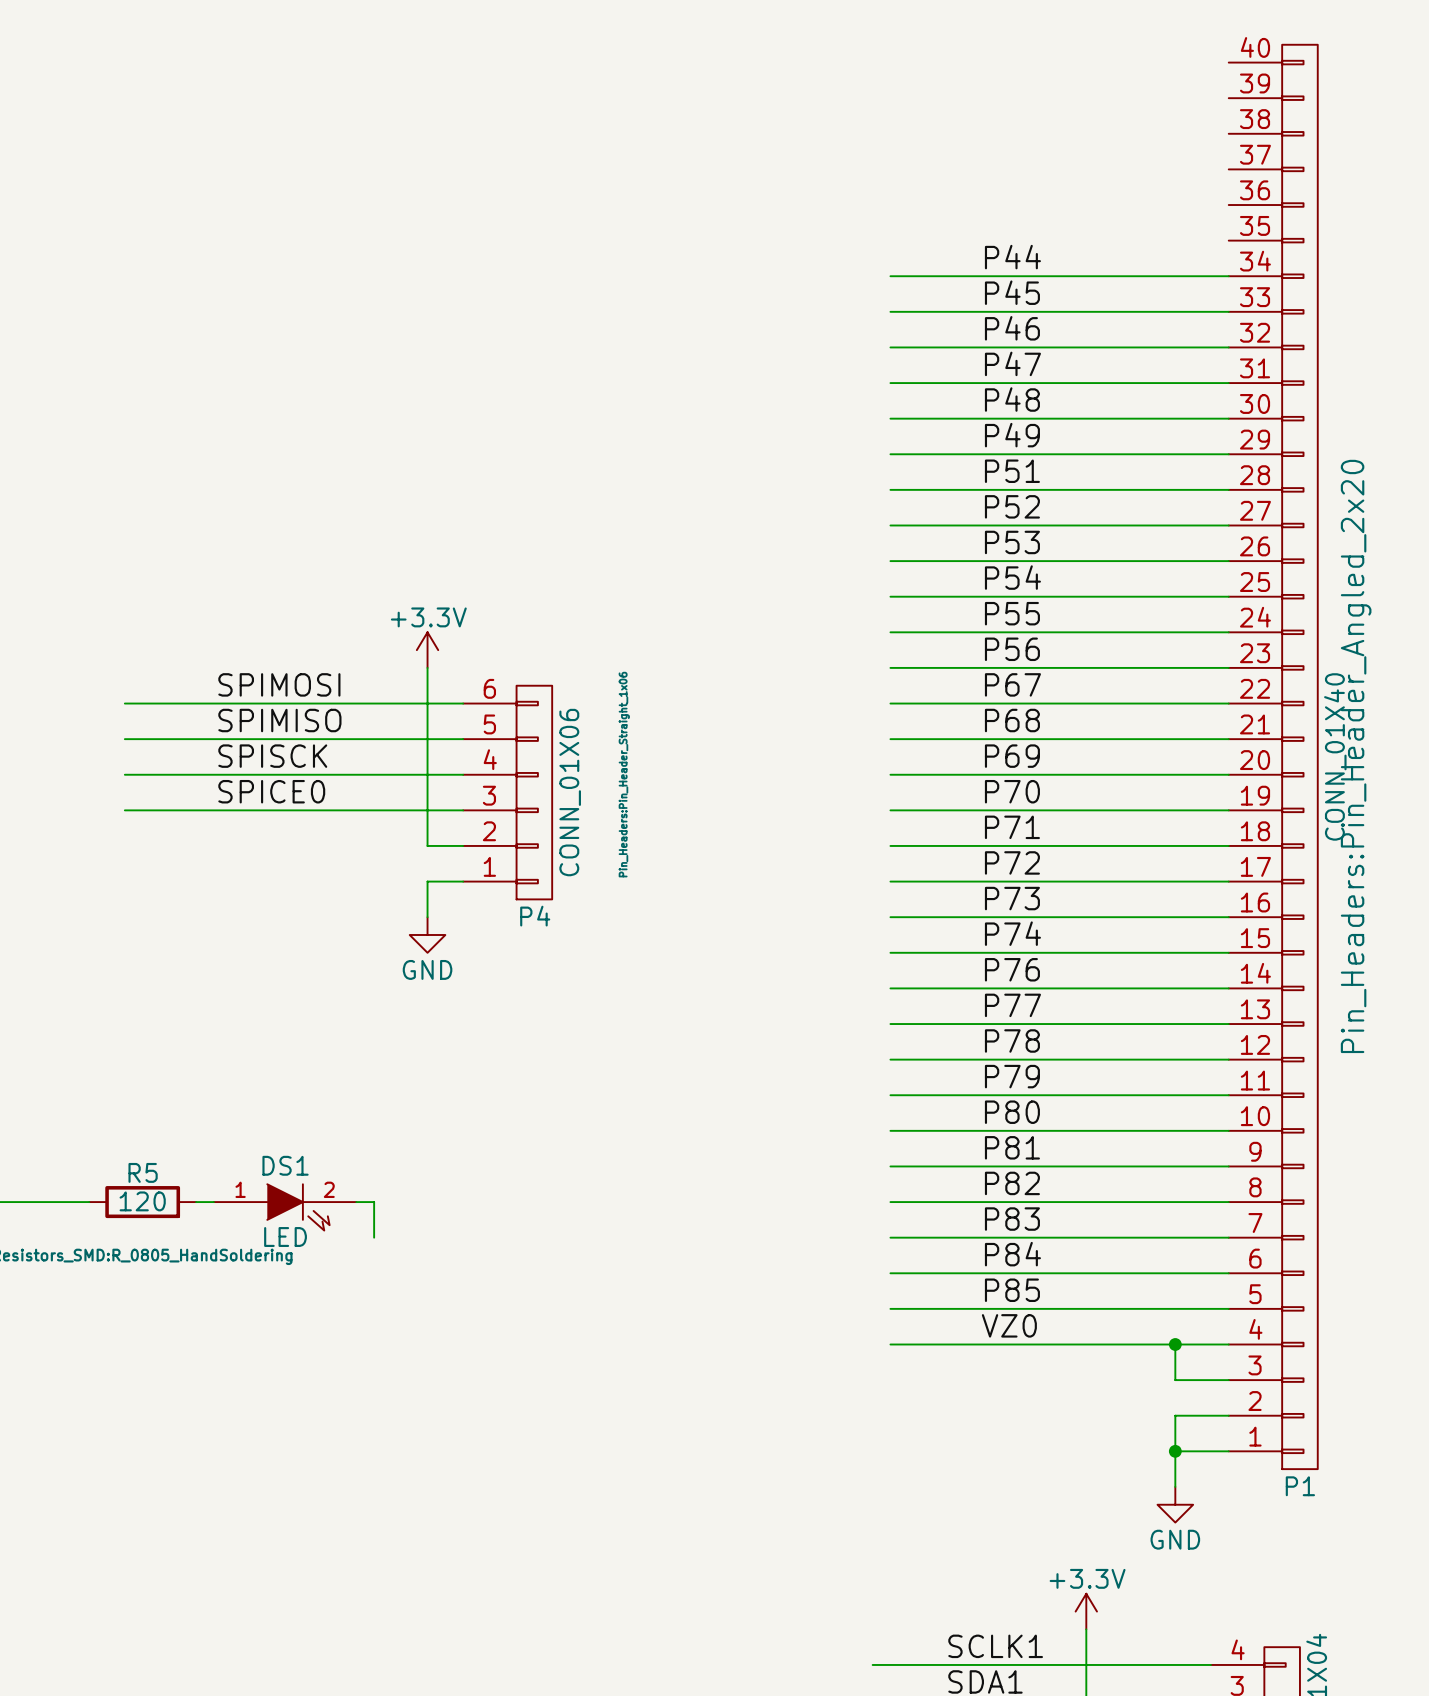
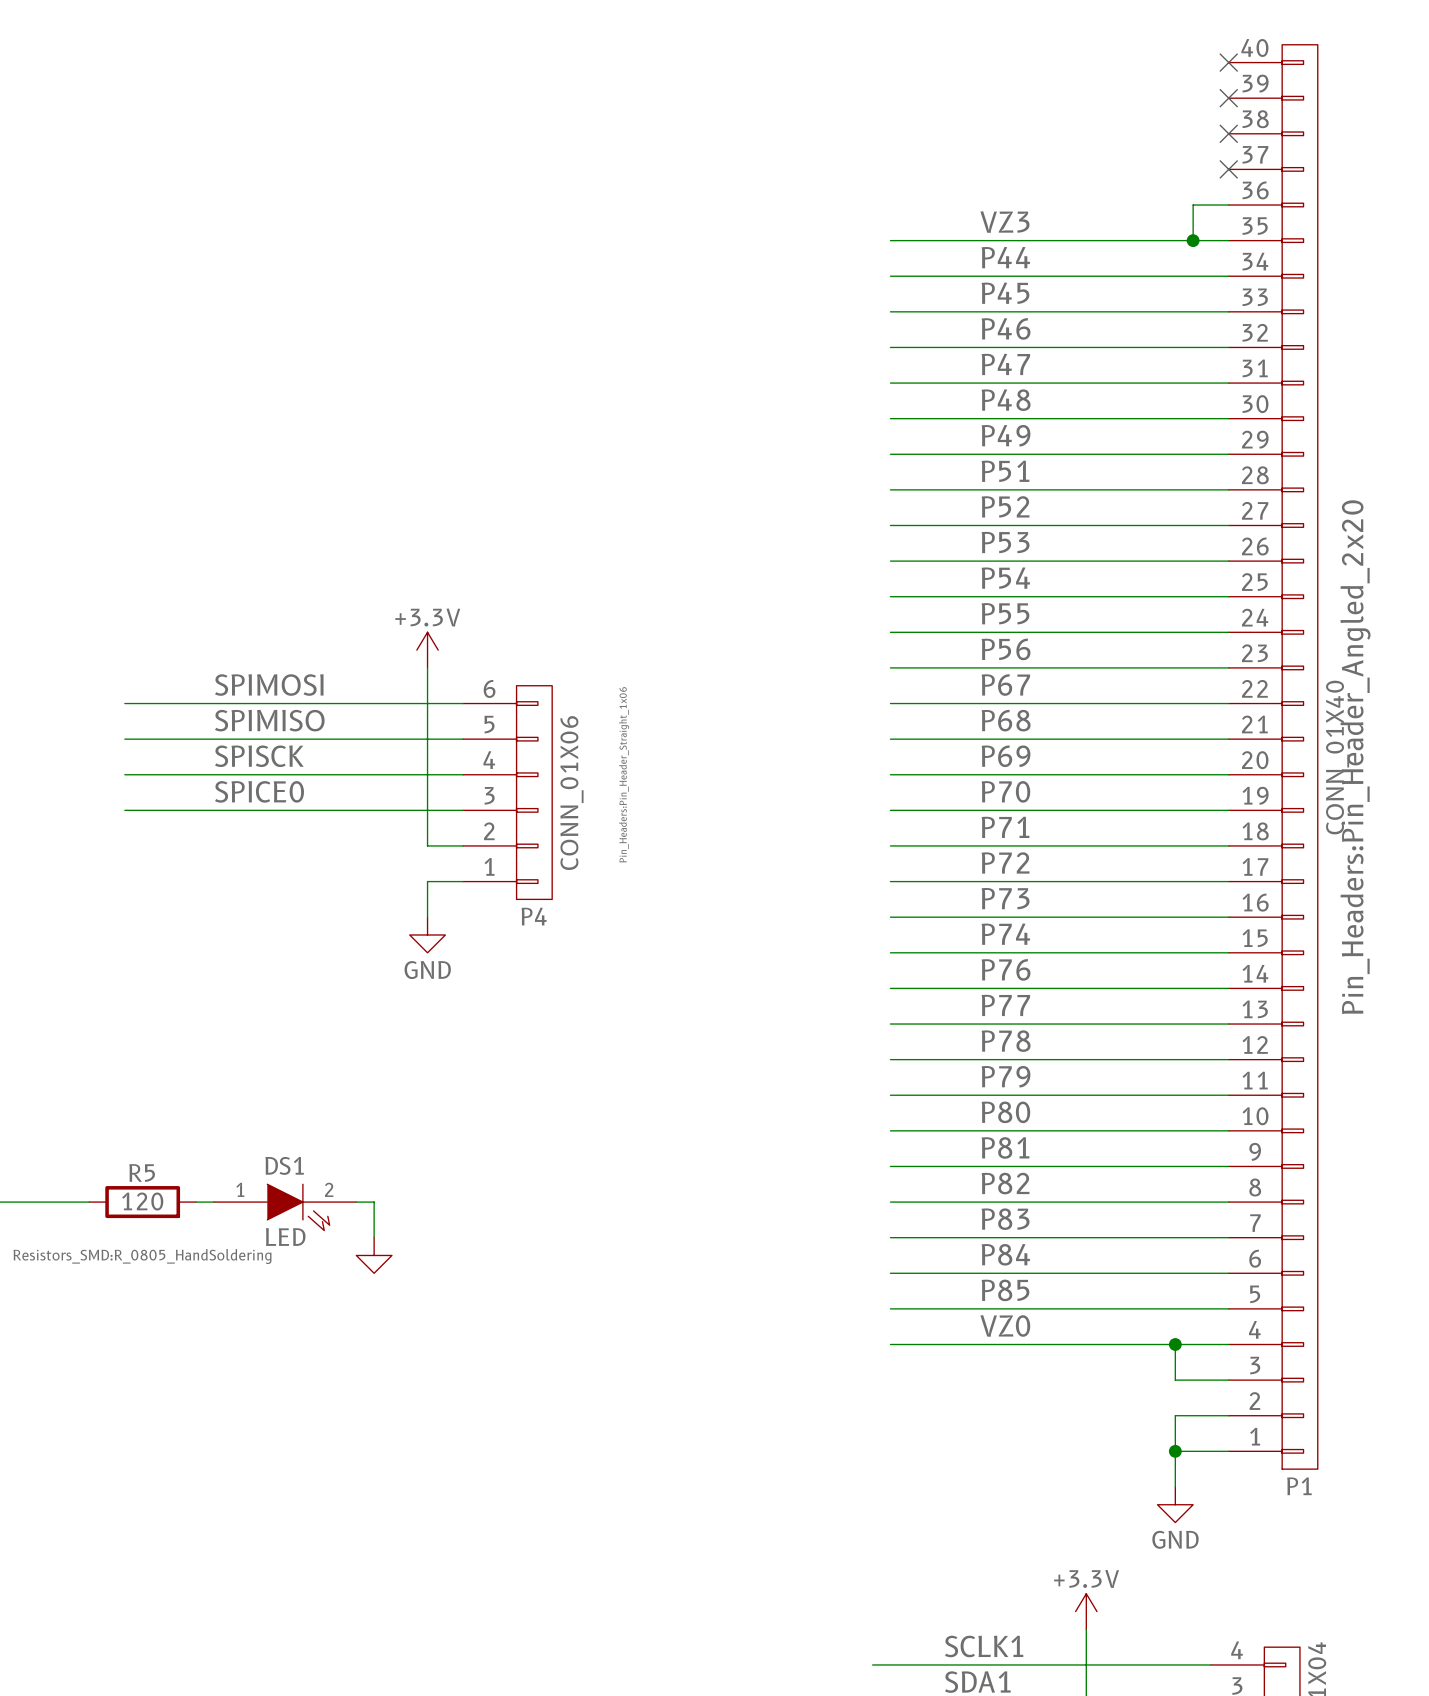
no-connect mark: none -> (1228, 62)
no-connect mark: none -> (1228, 98)
no-connect mark: none -> (1228, 133)
no-connect mark: none -> (1228, 169)
wire: none -> (1228, 205) (1193, 205) (1193, 240)
label: none -> VZ3 (1004, 222)
wire: none -> (890, 240) (1228, 240)
junction: none -> (1193, 240)
power symbol: none -> (374, 1255)

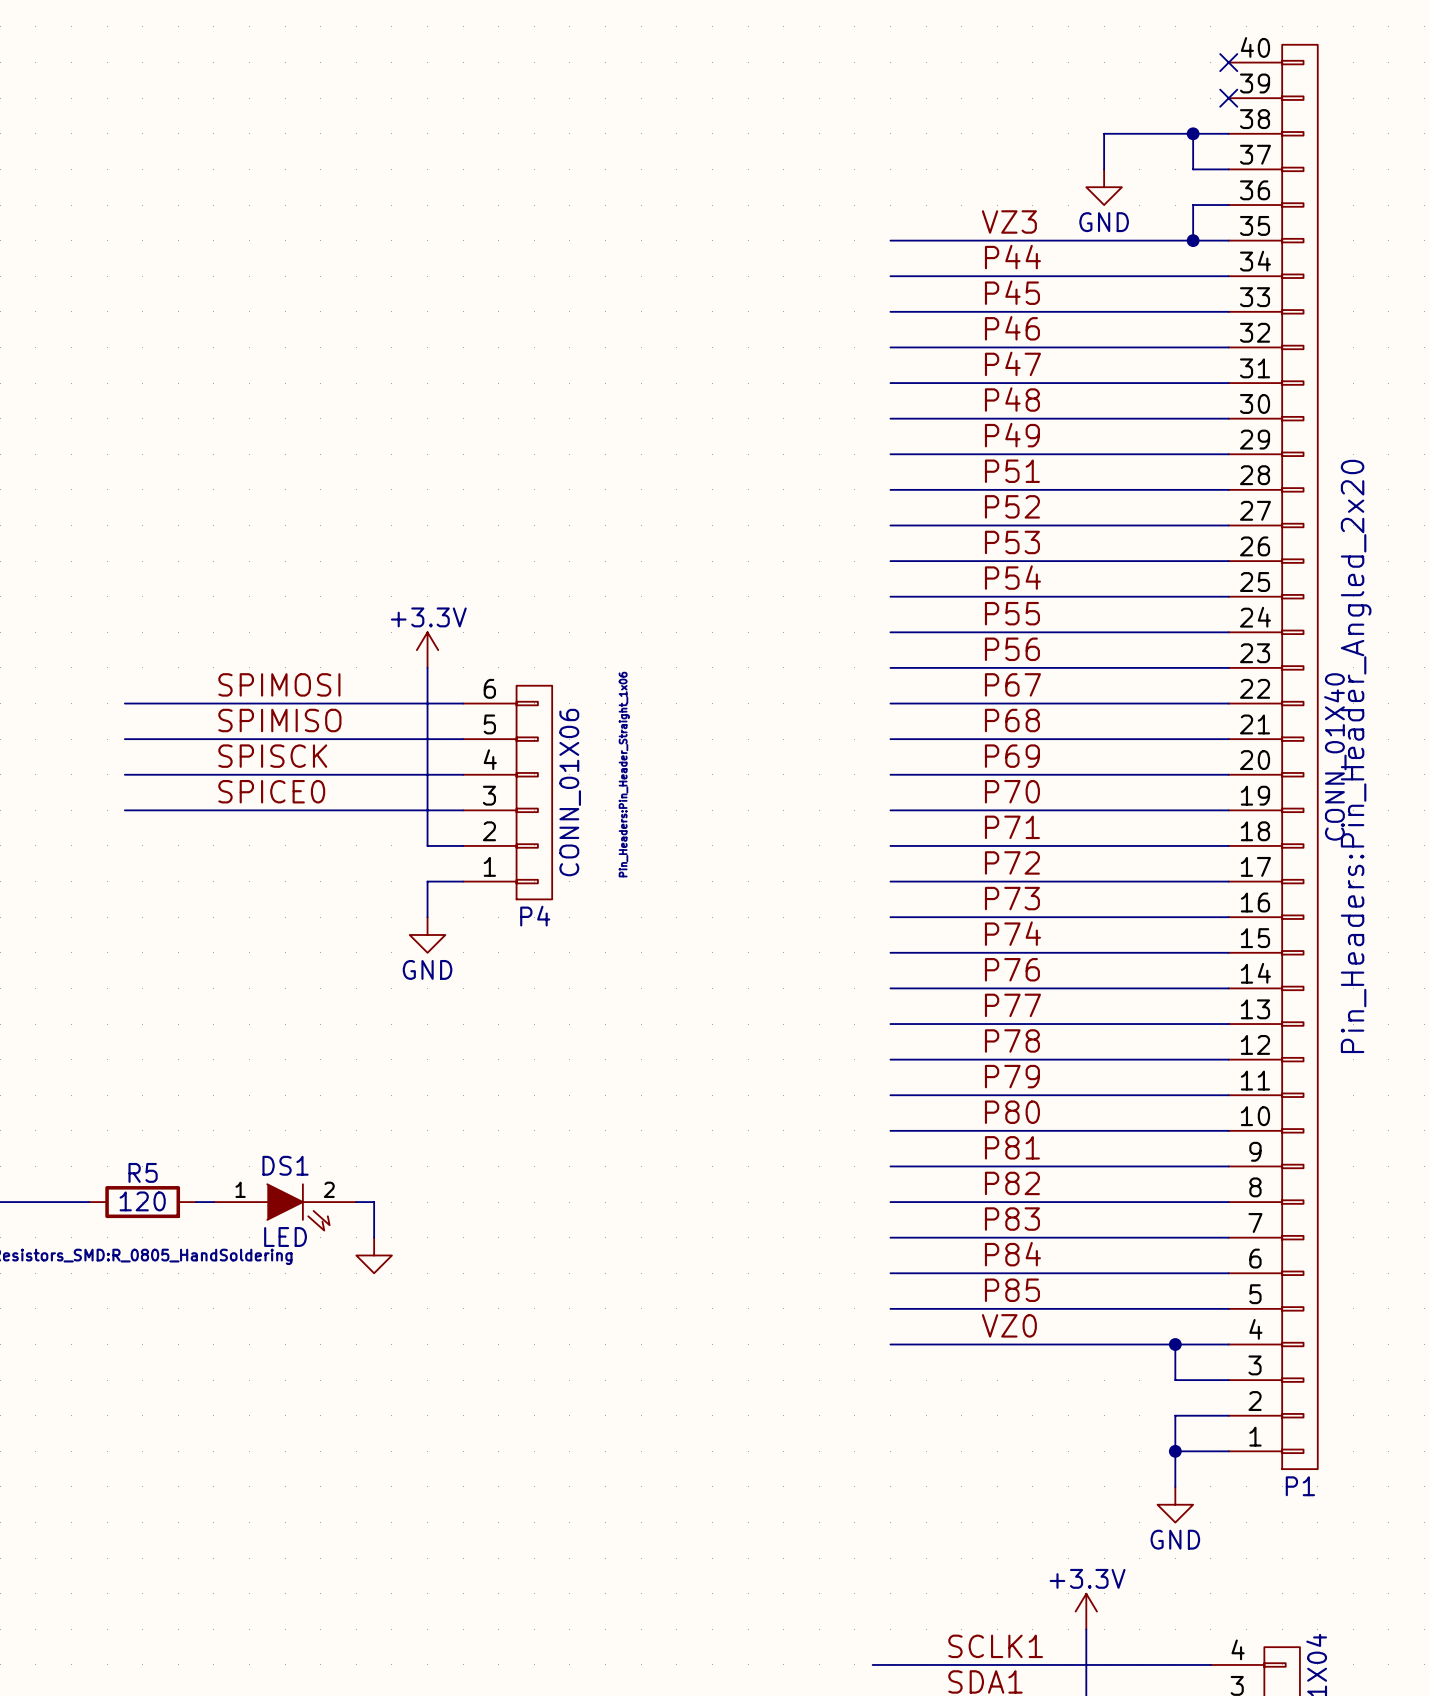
wire: none -> (1193, 133) (1193, 169) (1228, 169)
junction: none -> (1193, 133)
wire: none -> (1228, 133) (1104, 133) (1104, 169)
no-connect mark: (1228, 133) -> none
no-connect mark: (1228, 169) -> none
power symbol: none -> GND (1104, 187)

